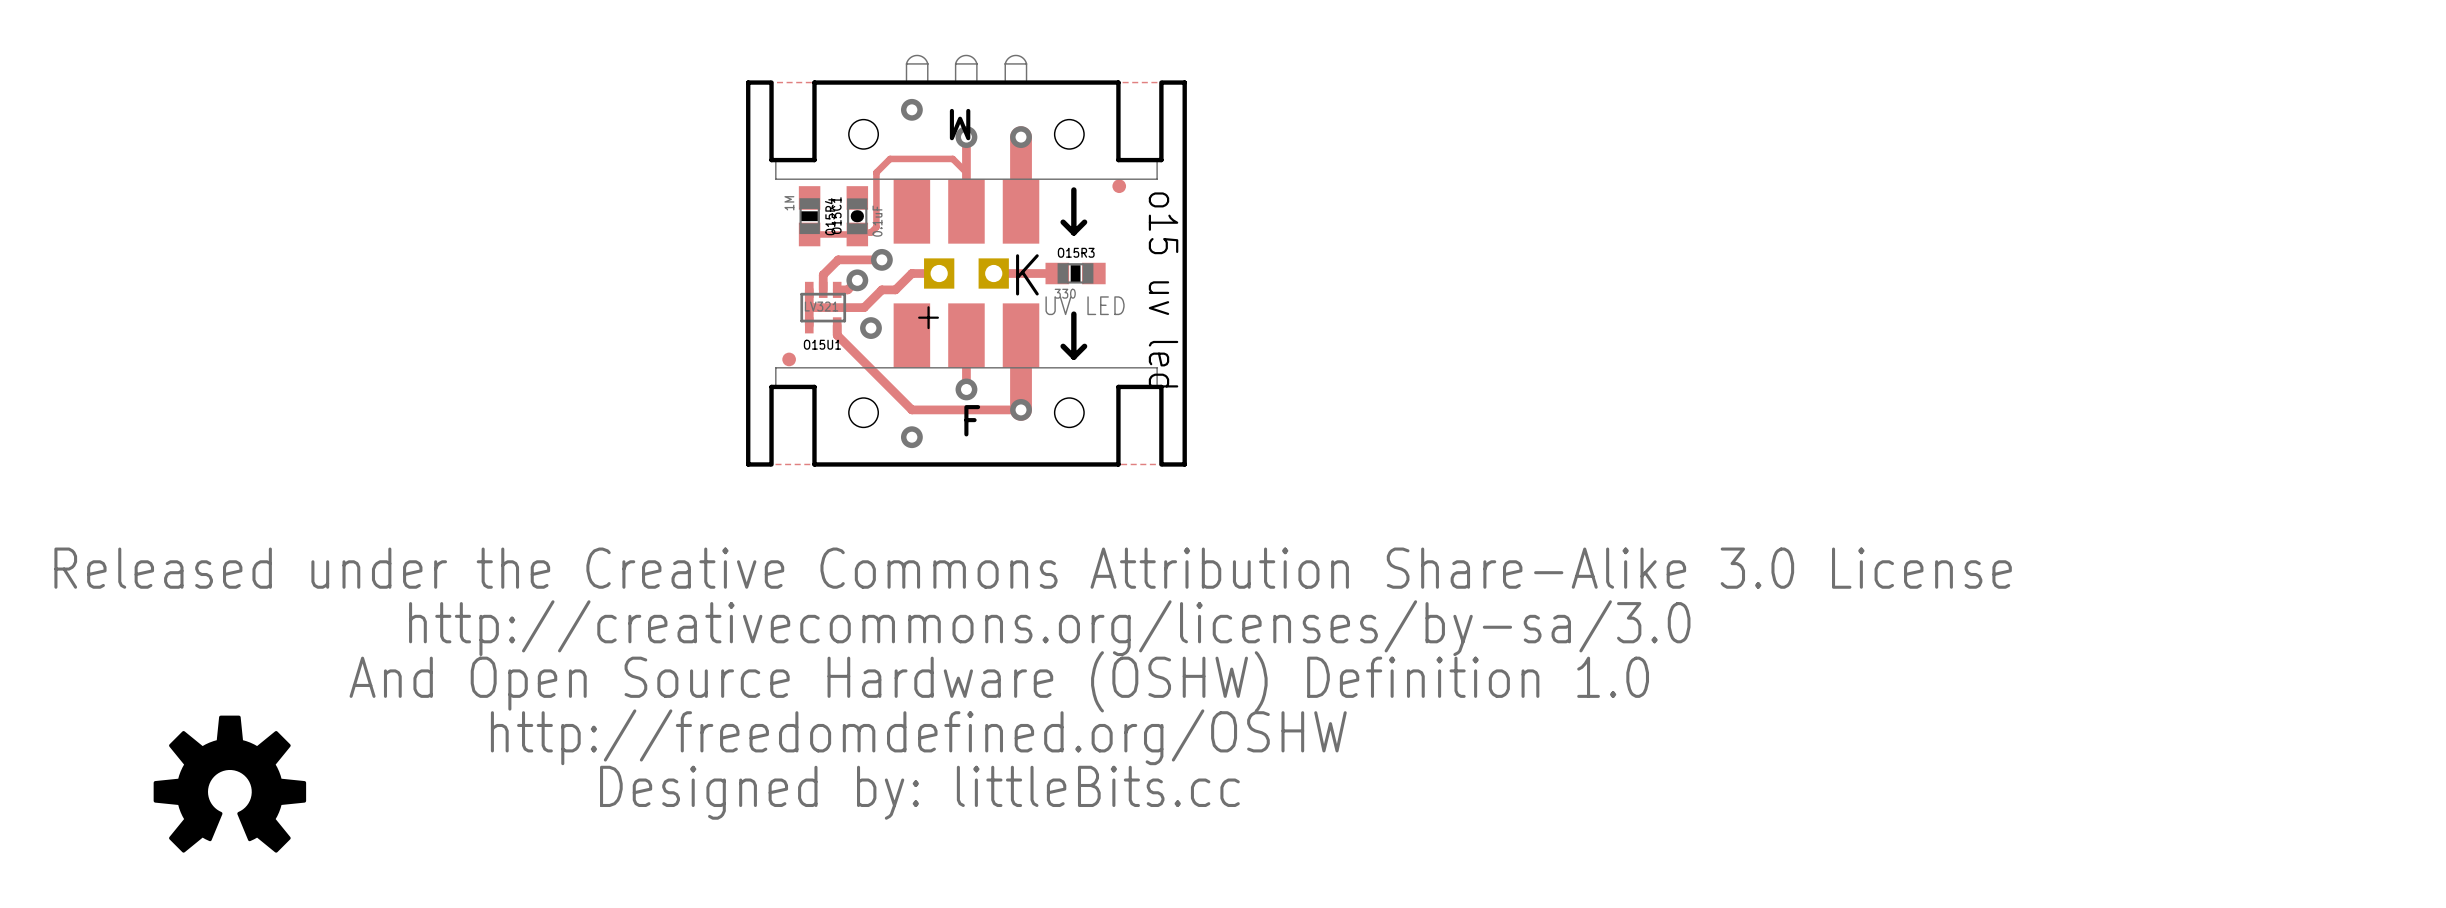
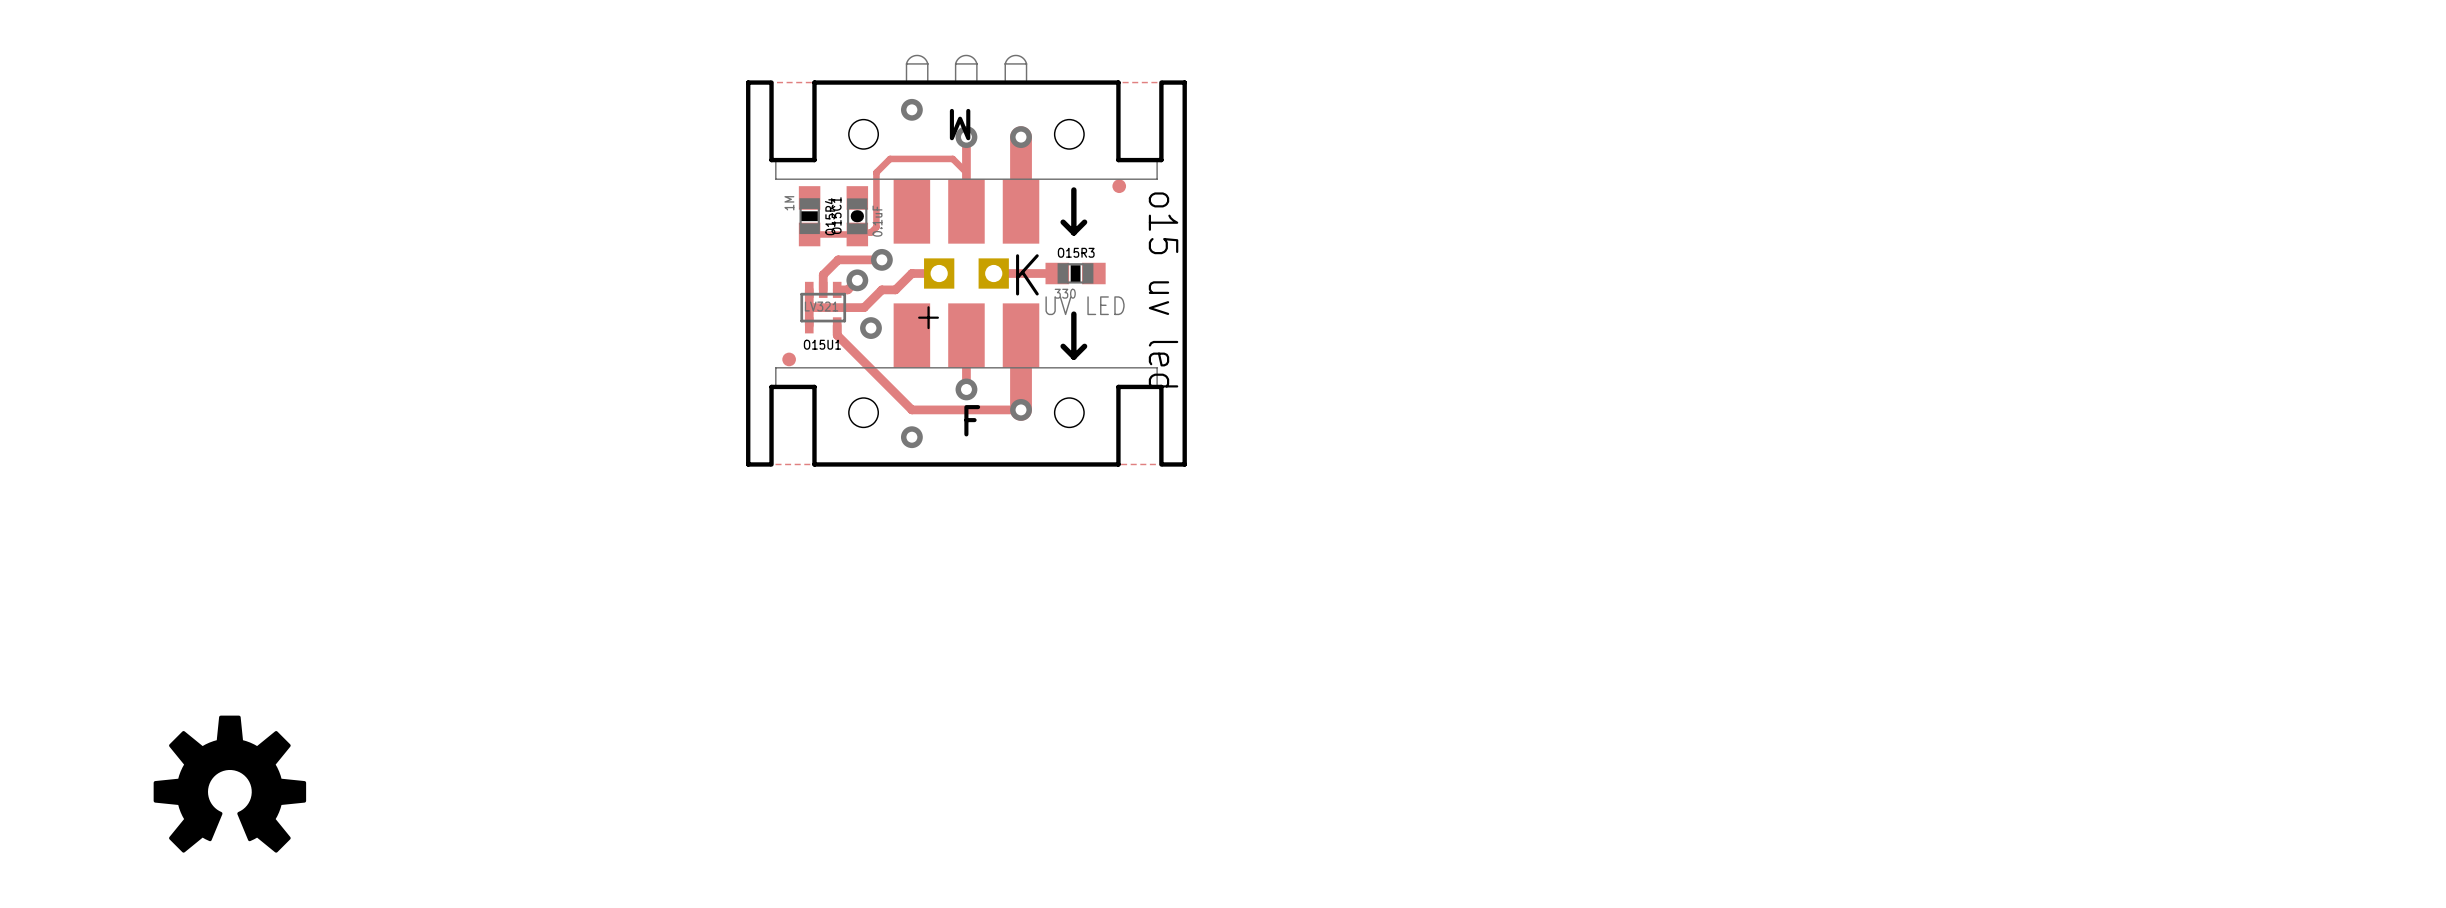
drawing: [54, 547, 2012, 820] -> none

